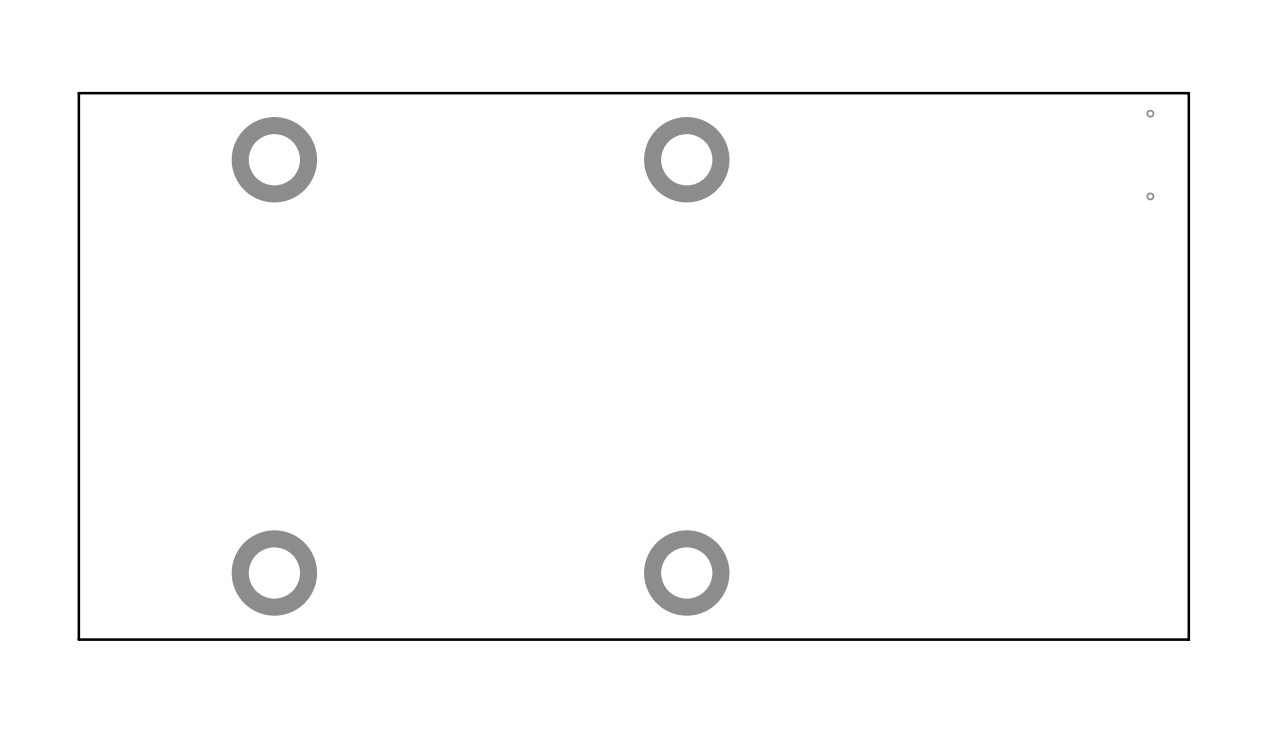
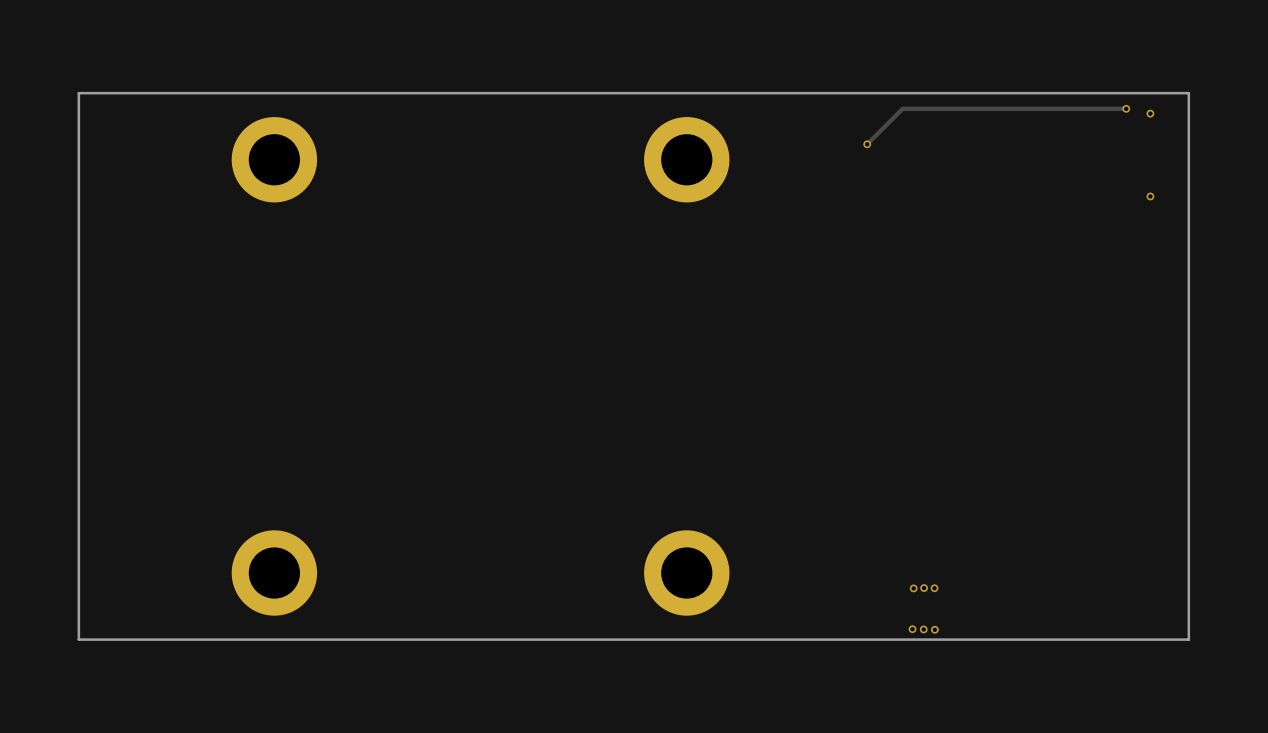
track: none -> (1126, 108) (902, 108) (867, 144)
via: none -> (1126, 108)
via: none -> (867, 144)
via: none -> (913, 588)
via: none -> (924, 588)
via: none -> (934, 588)
via: none -> (912, 629)
via: none -> (923, 629)
via: none -> (934, 629)

